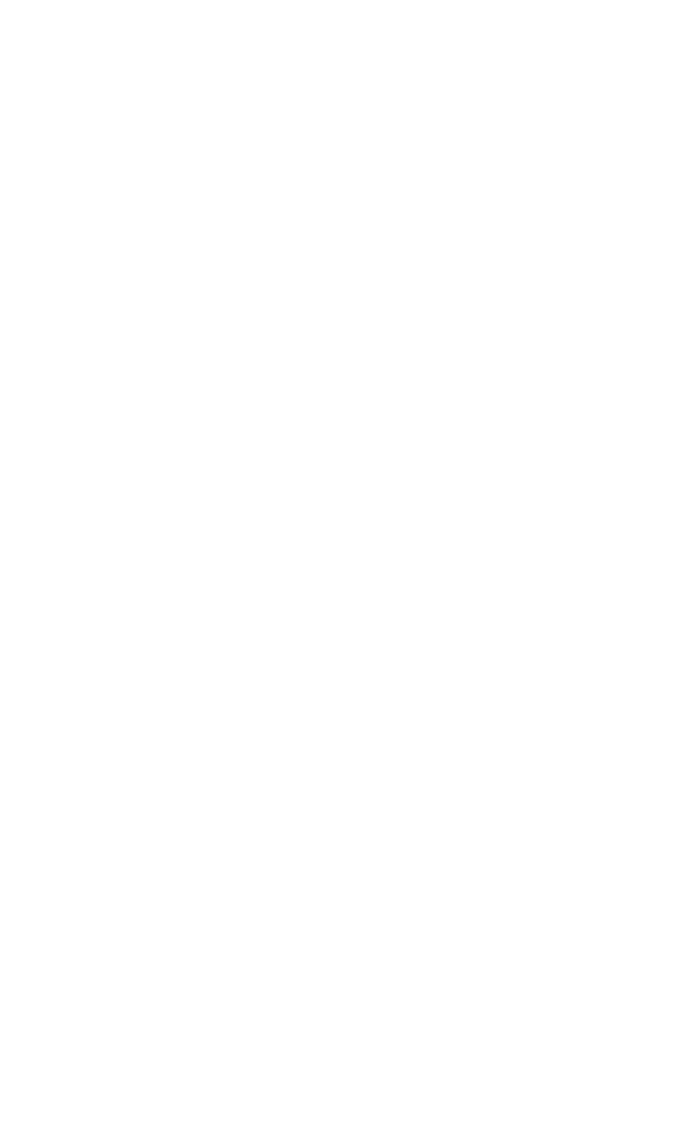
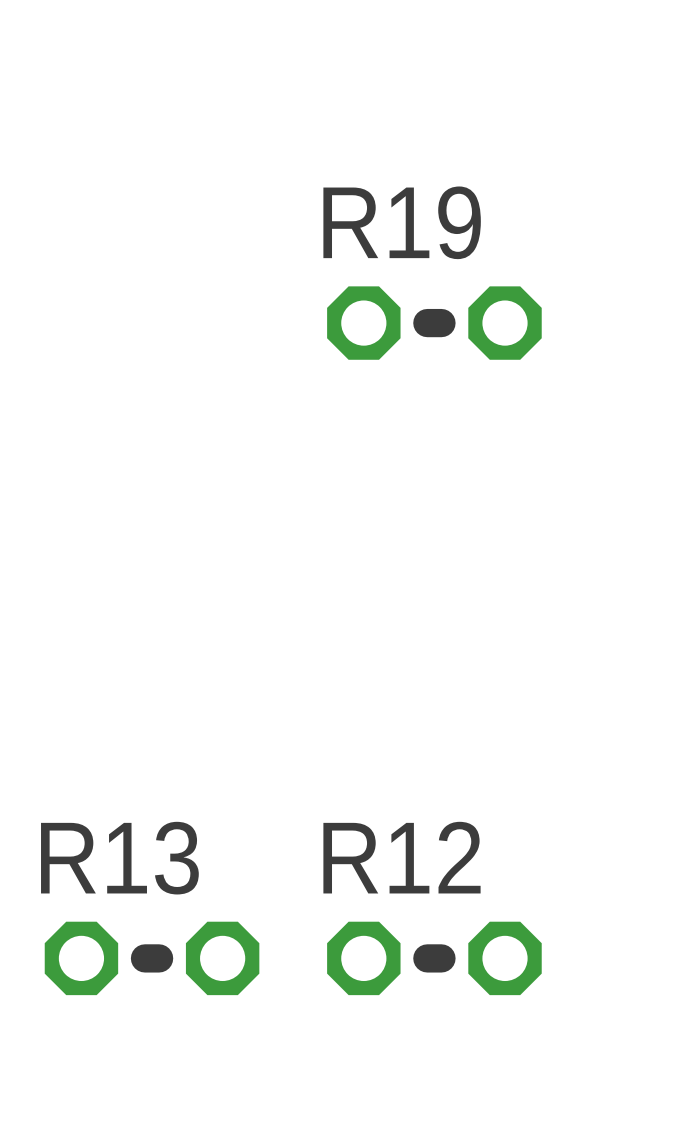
R19: none -> (434, 323)
R13: none -> (152, 958)
R12: none -> (434, 958)

